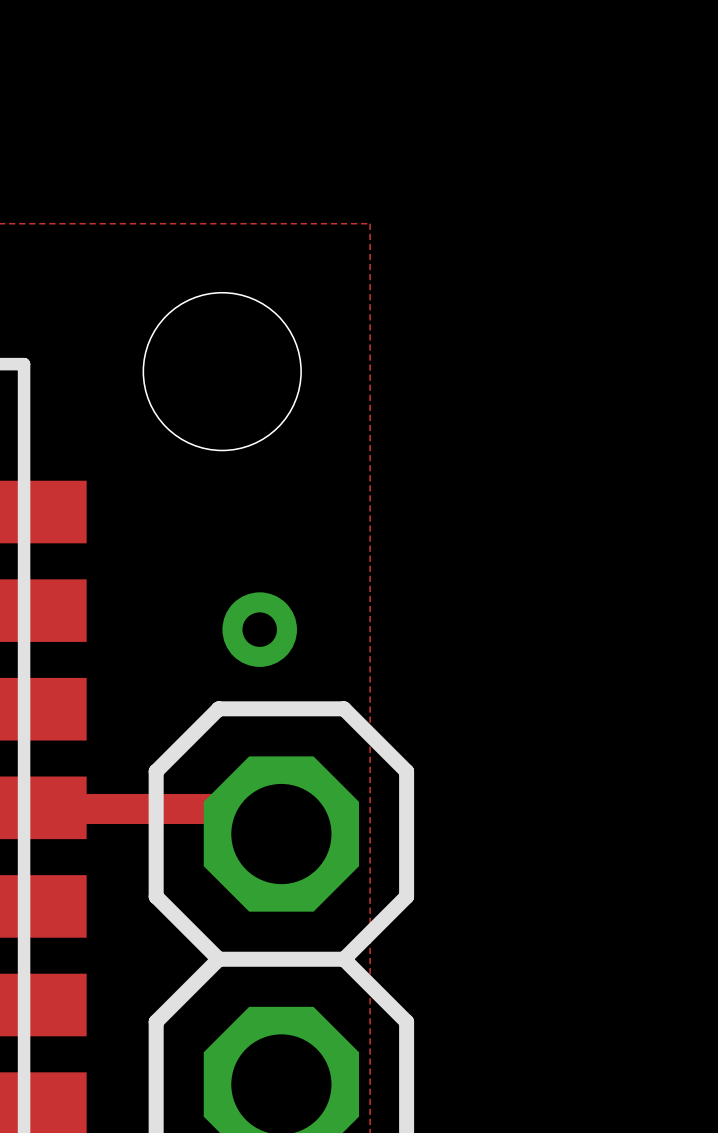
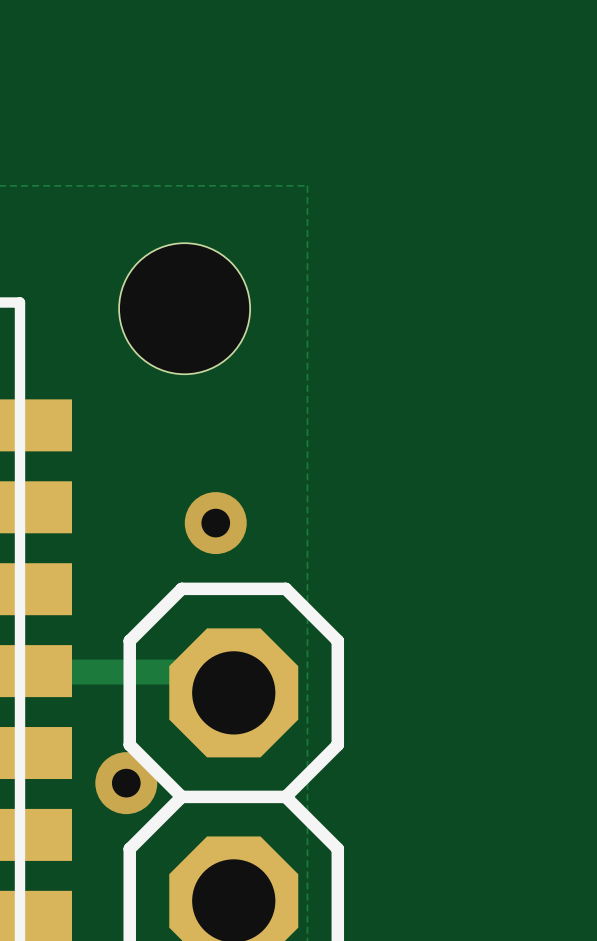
via: none -> (126, 783)

